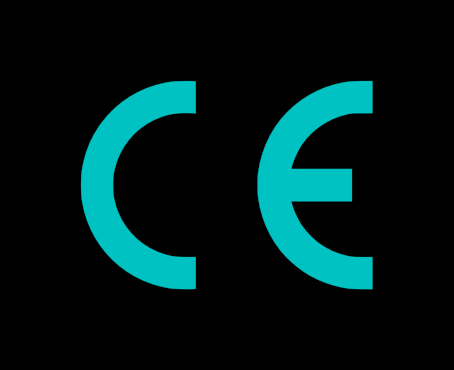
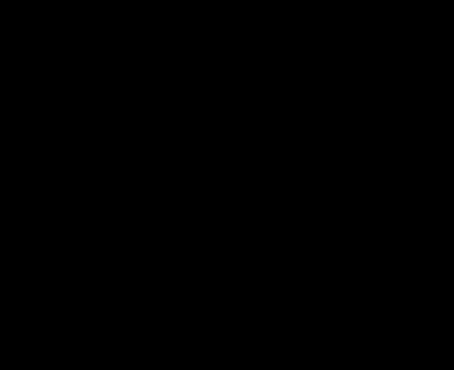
drawing: [80, 80, 373, 290] -> none

